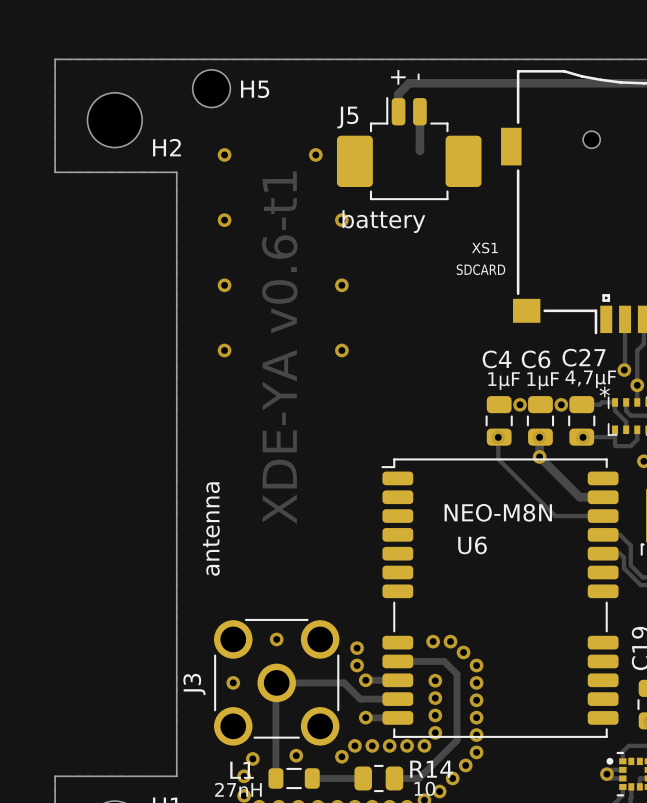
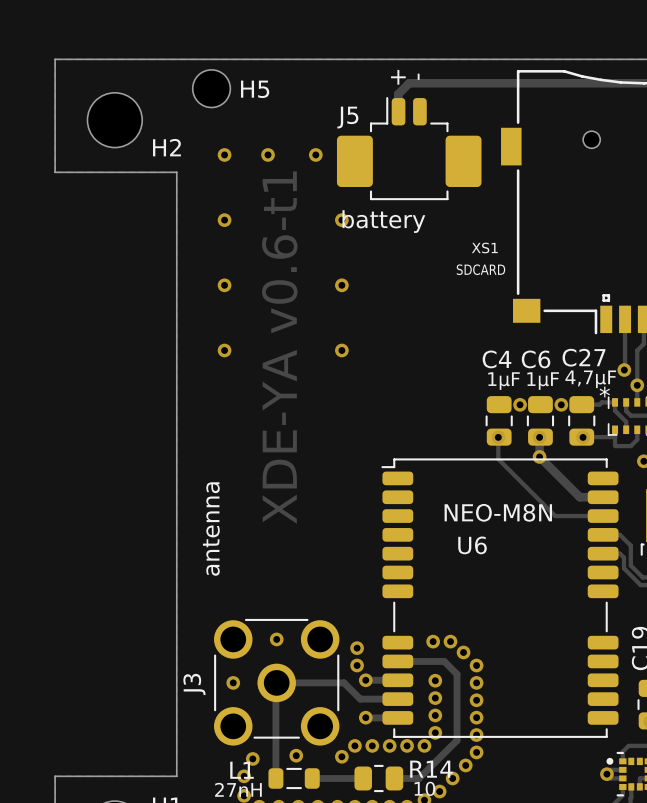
track: (419, 111) (419, 150) -> none
via: none -> (268, 154)

